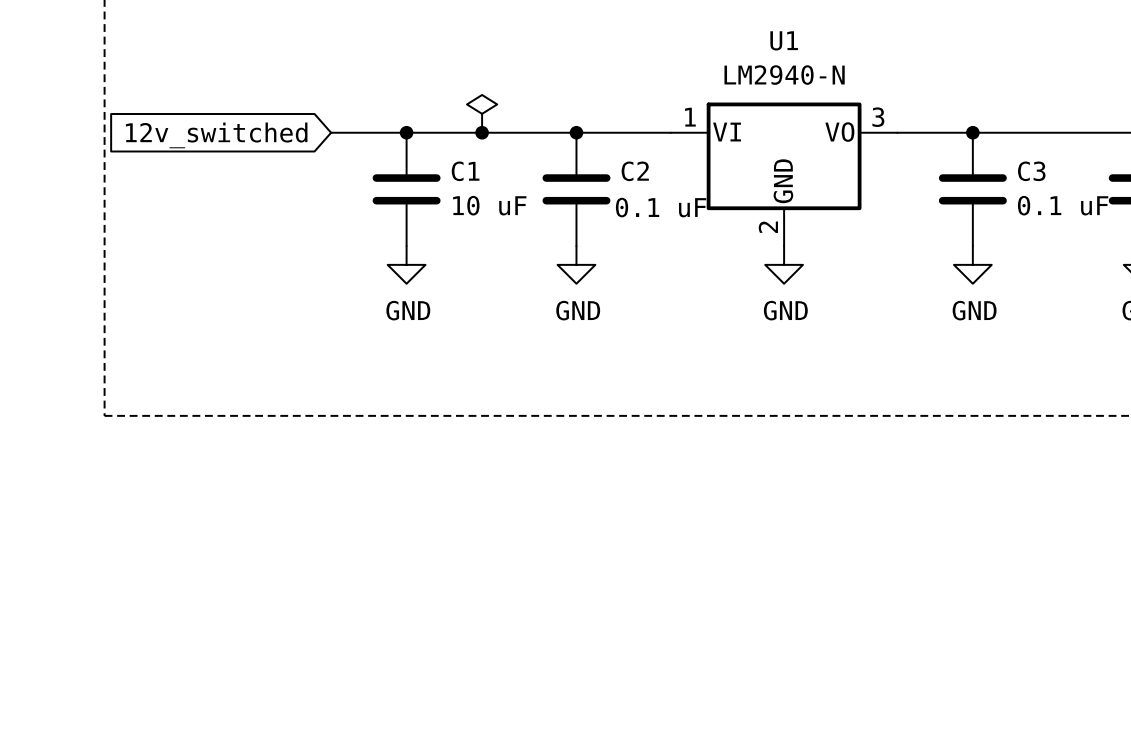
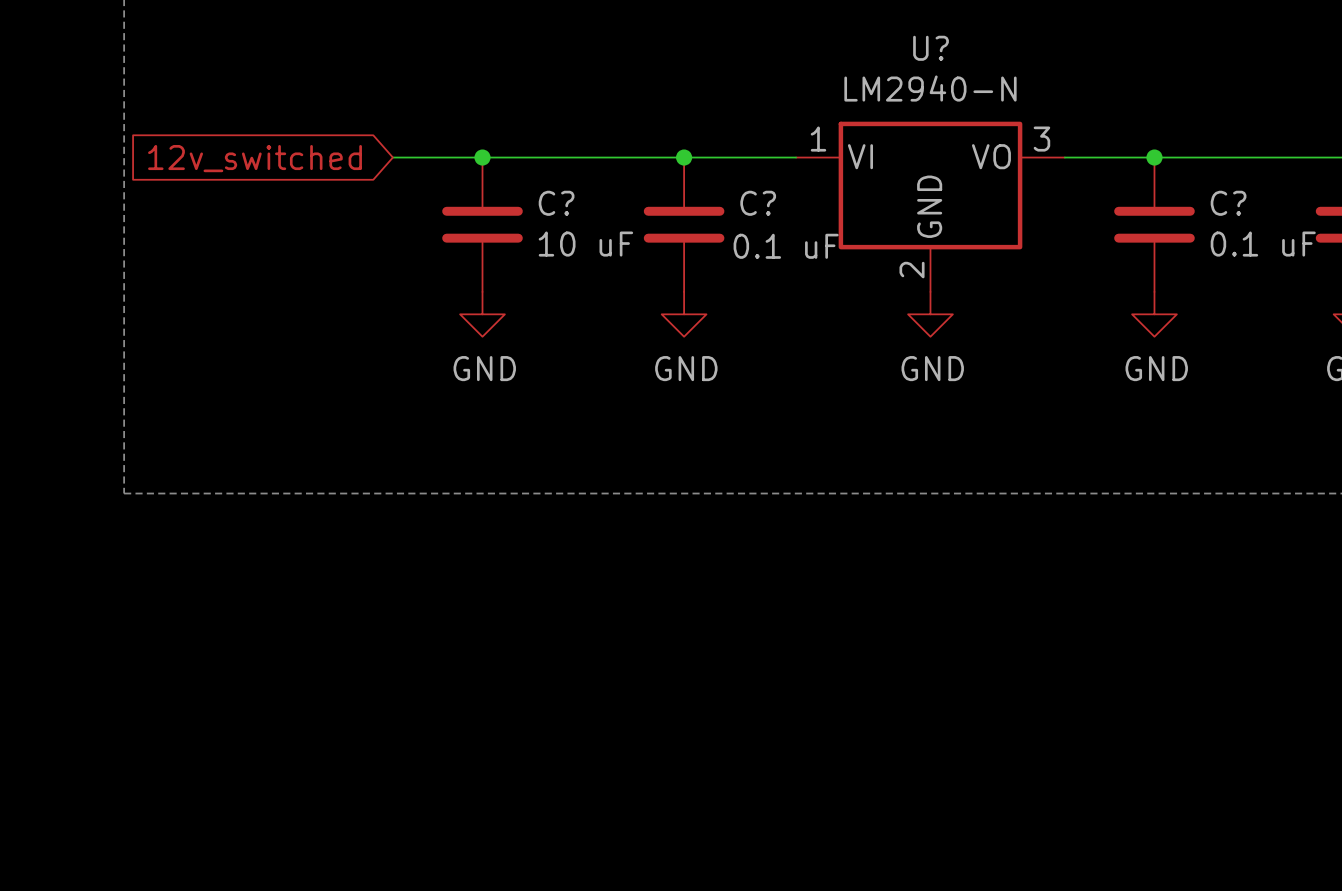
U1 name: U1 (784, 40) -> U? (931, 48)
power symbol: (482, 113) -> none
junction: (482, 132) -> none
C1 name: C1 (465, 171) -> C? (556, 203)
C2 name: C2 (635, 171) -> C? (758, 203)
C3 name: C3 (1031, 171) -> C? (1228, 203)

